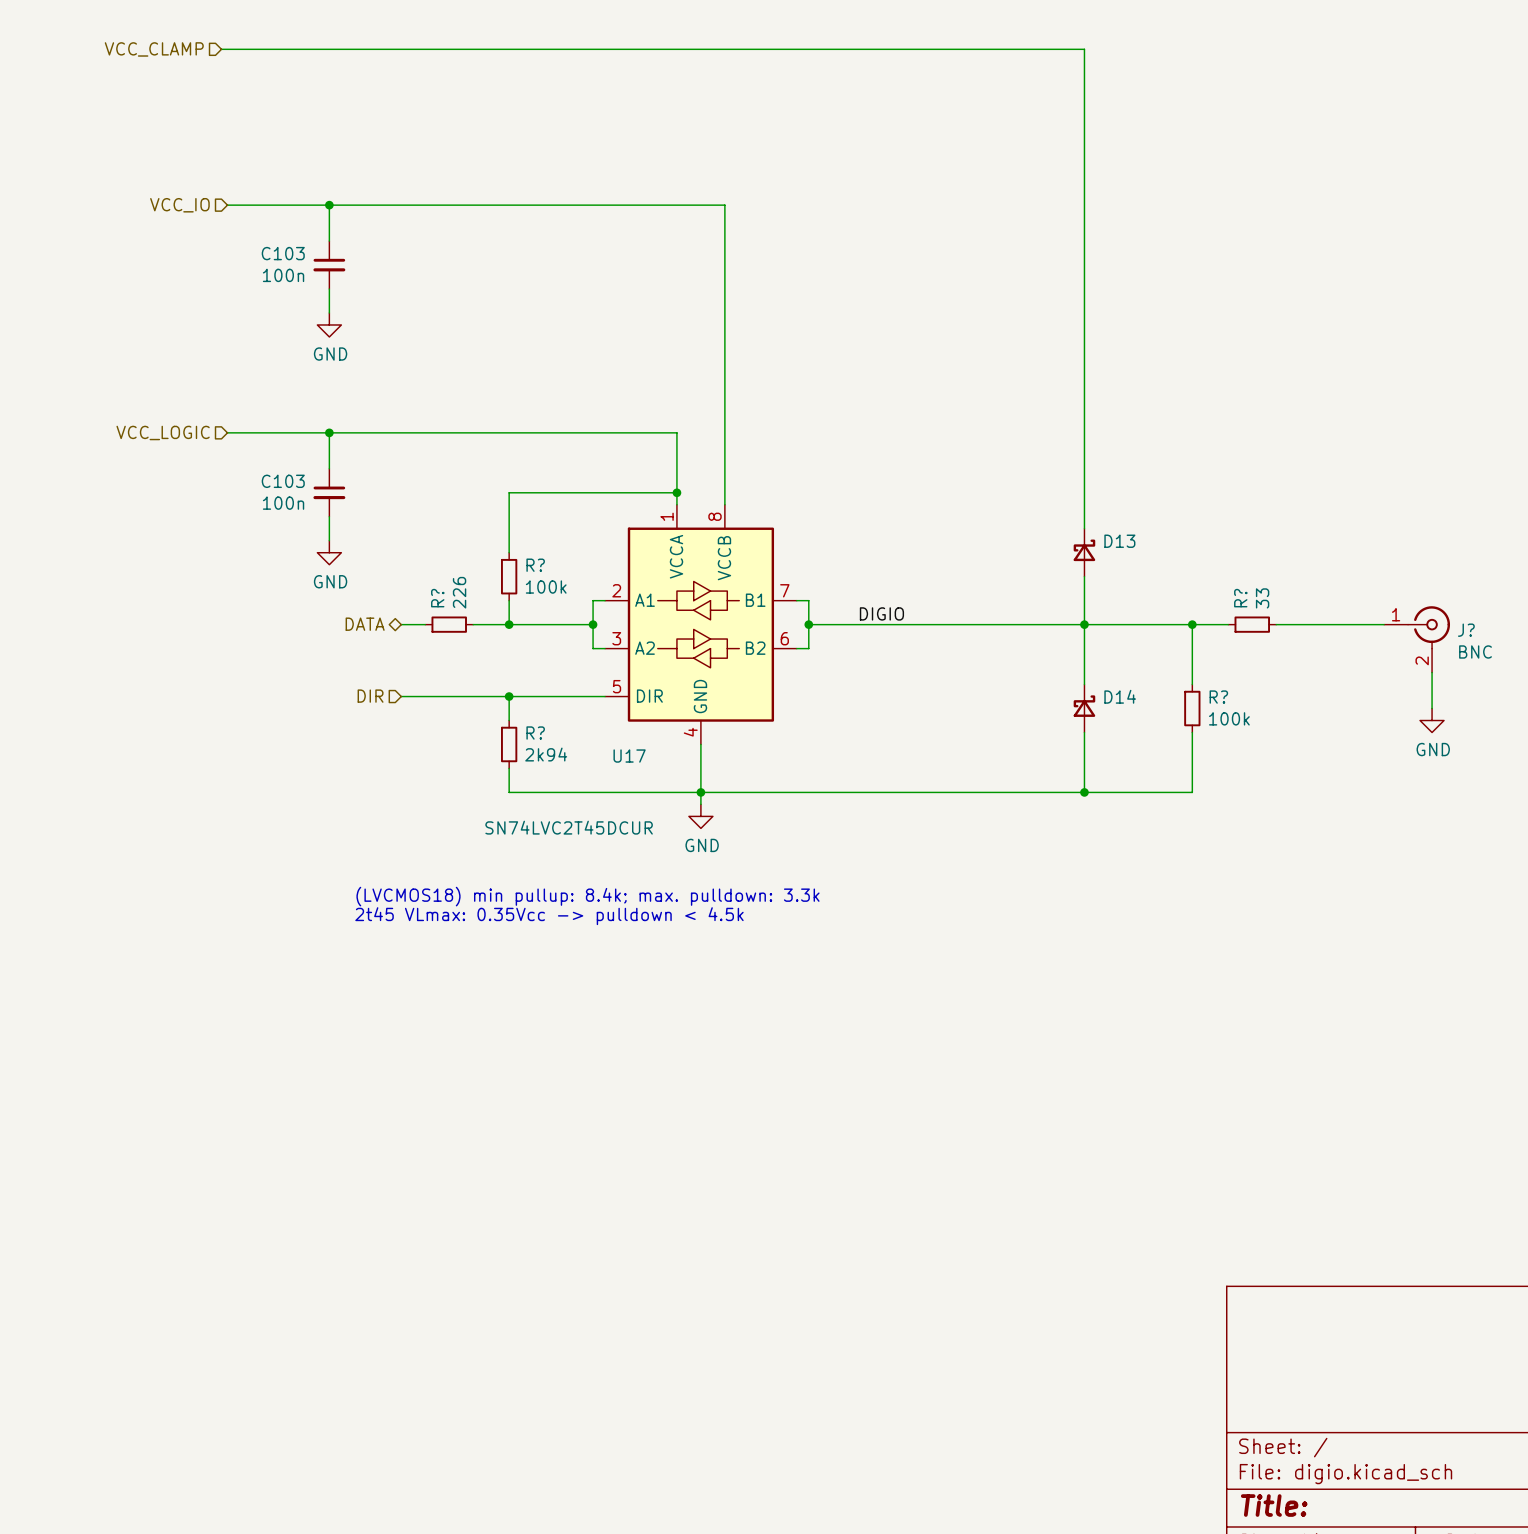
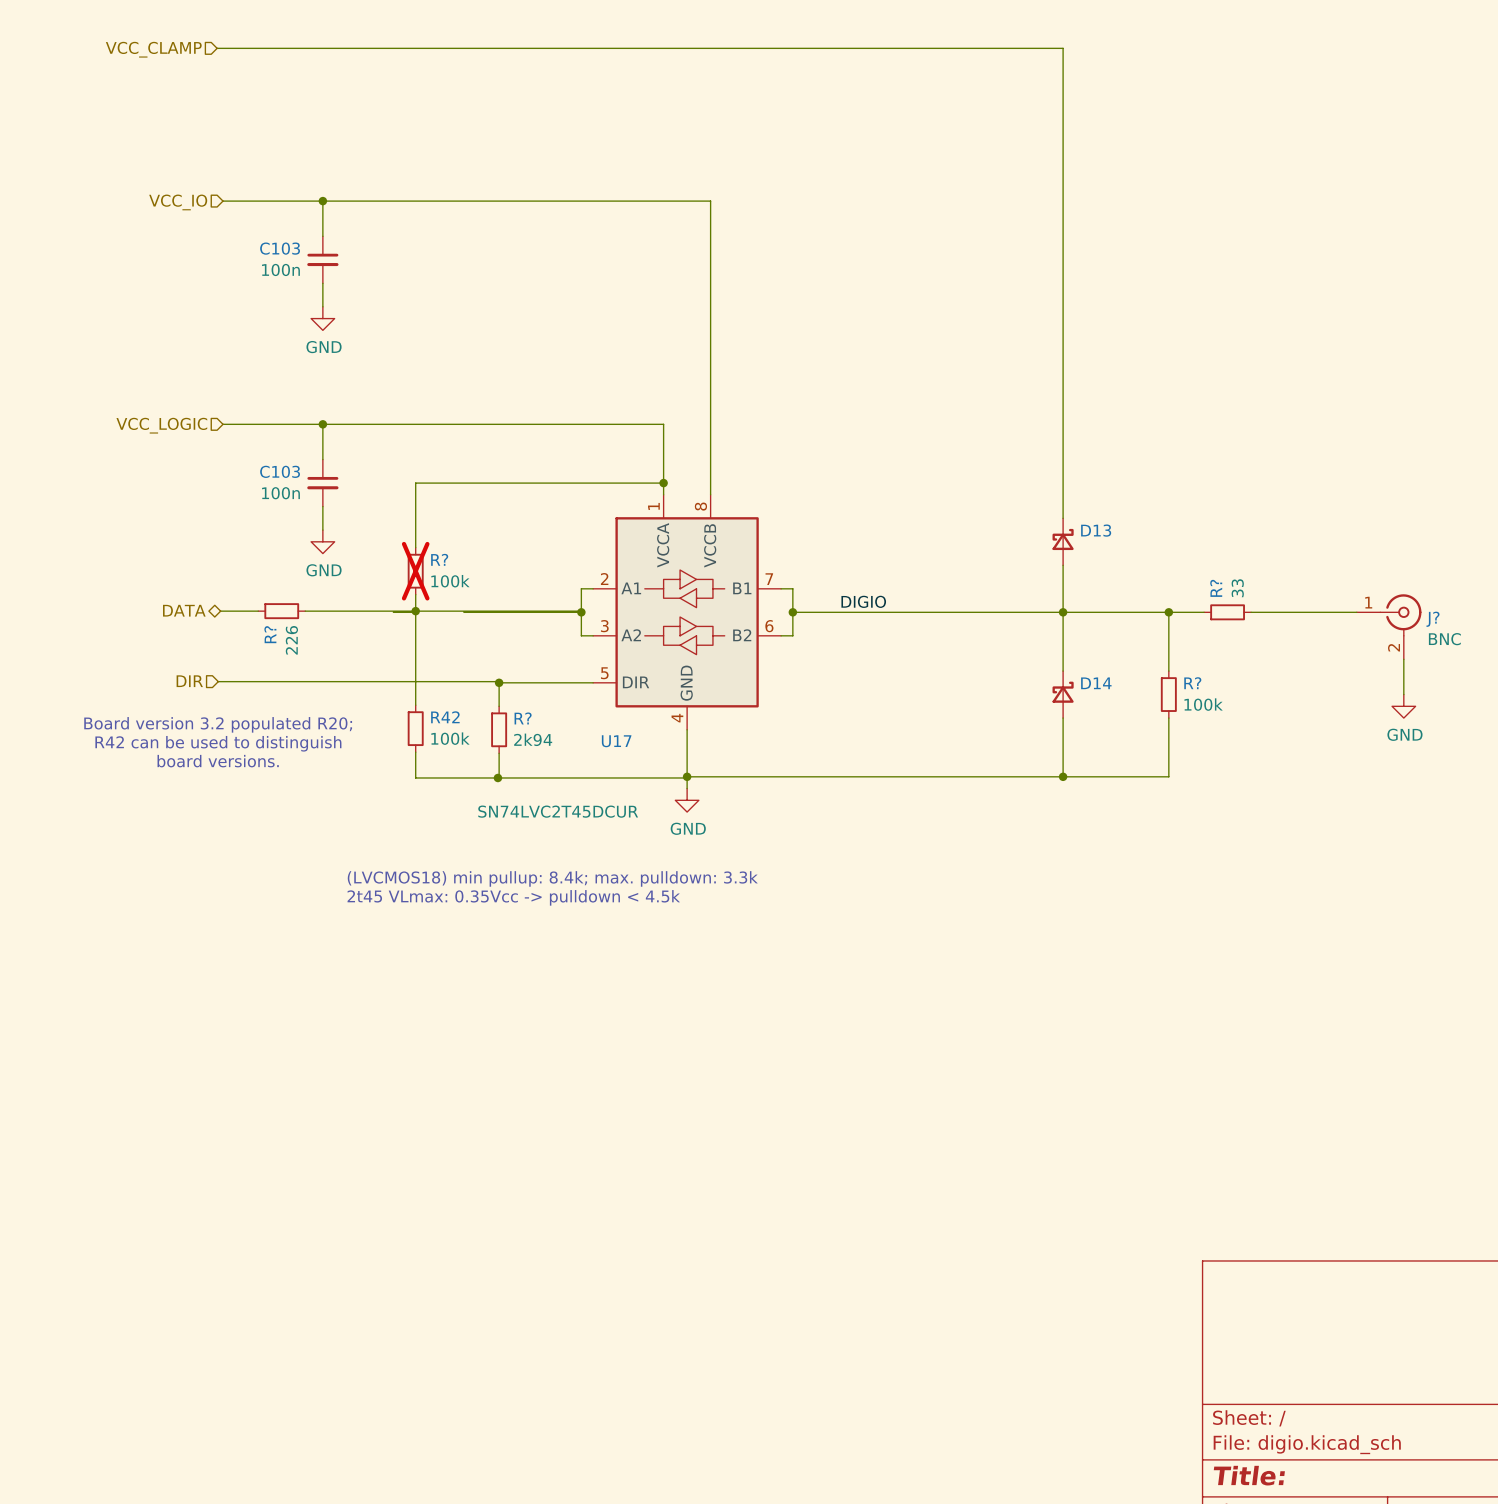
wire: (509, 492) (509, 552) -> (499, 483) (415, 483) (415, 547)
R? position: (509, 576) -> (415, 571)
R? do-not-place cross: none -> (415, 571)
R? value position: 226 (459, 592) -> 226 (291, 640)
R? name position: R? (437, 598) -> R? (270, 634)
wire: (509, 600) (509, 624) -> none
wire: none -> (415, 594) (415, 705)
wire: none -> (220, 611) (258, 611)
wire: none -> (305, 611) (581, 611)
junction: none -> (415, 611)
hierarchical label position: DATA (365, 624) -> DATA (184, 610)
R? position: (449, 624) -> (281, 611)
junction: (509, 624) -> none
hierarchical label position: DIR (370, 696) -> DIR (189, 681)
wire: (401, 696) (509, 696) -> (218, 681) (499, 682)
text: none -> Board version 3.2 populated R20; (218, 724)
R42: none -> 100k (415, 728)
text: none -> R42 can be used to distinguish (218, 743)
text: none -> board versions. (218, 761)
wire: (509, 791) (699, 792) -> (415, 752) (415, 777) (685, 776)
junction: none -> (497, 777)

